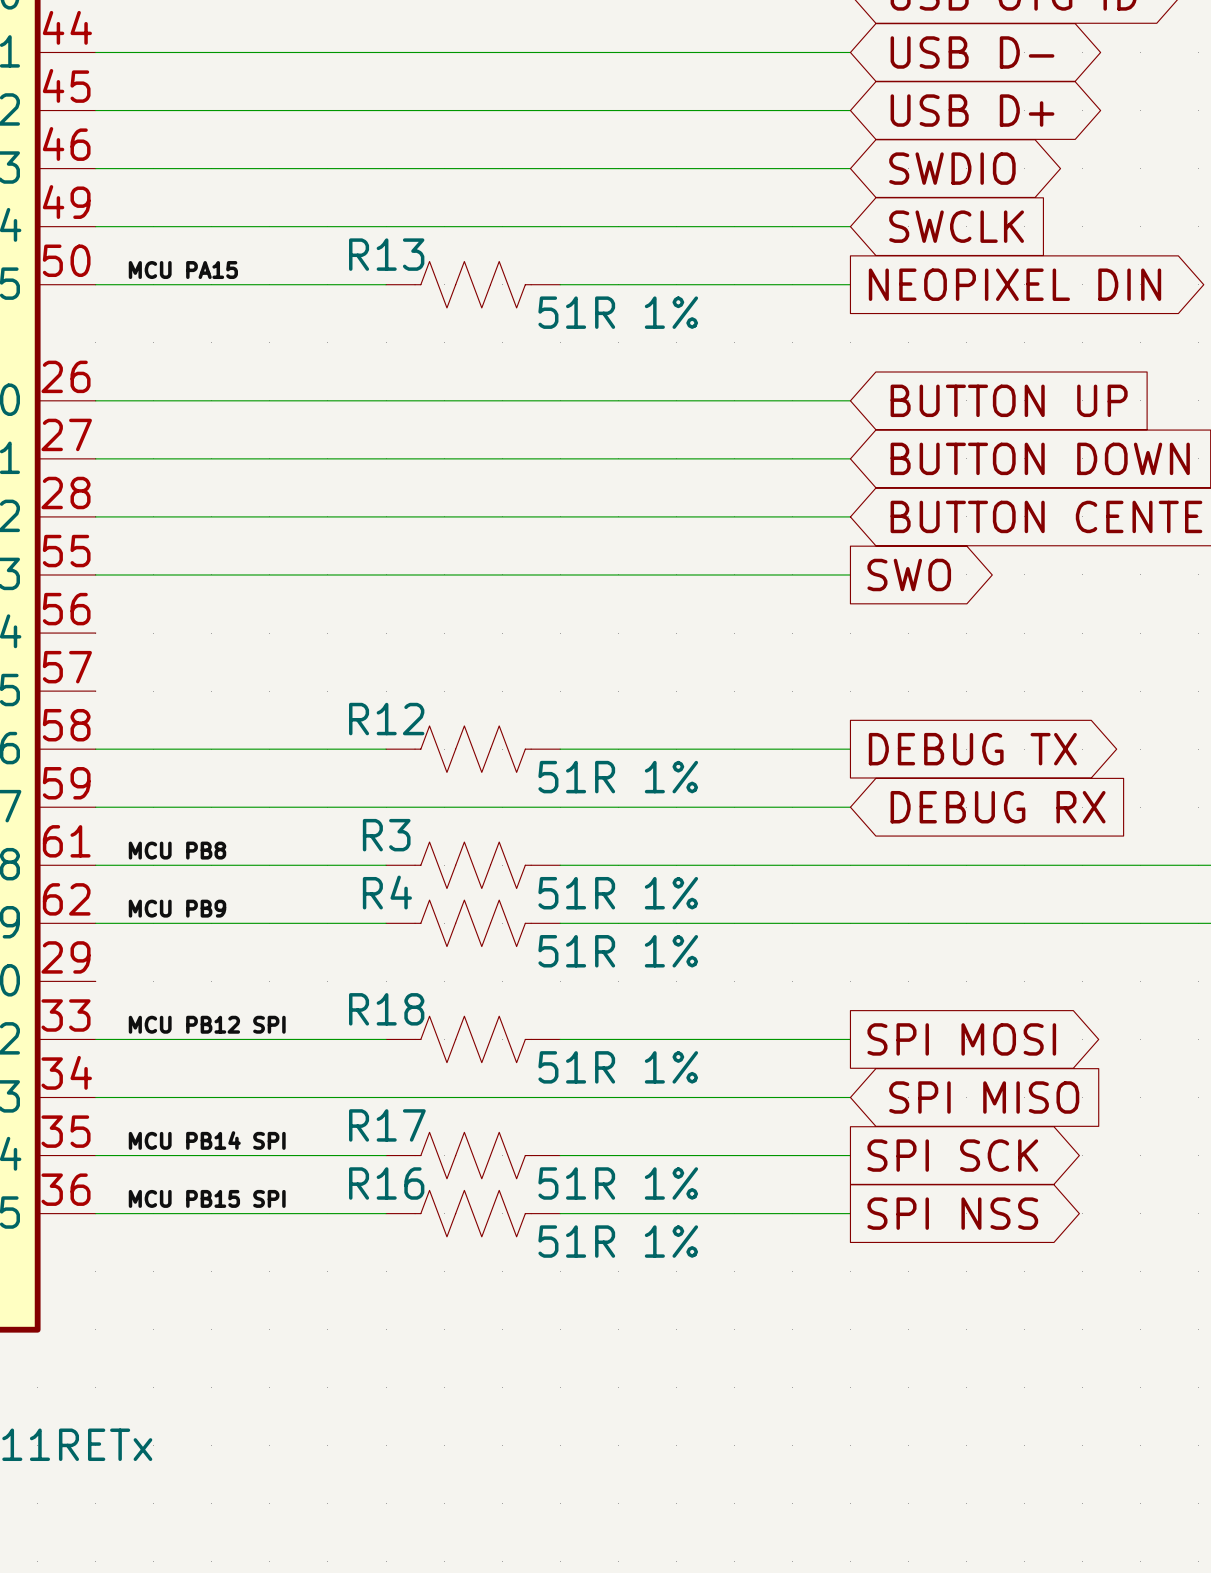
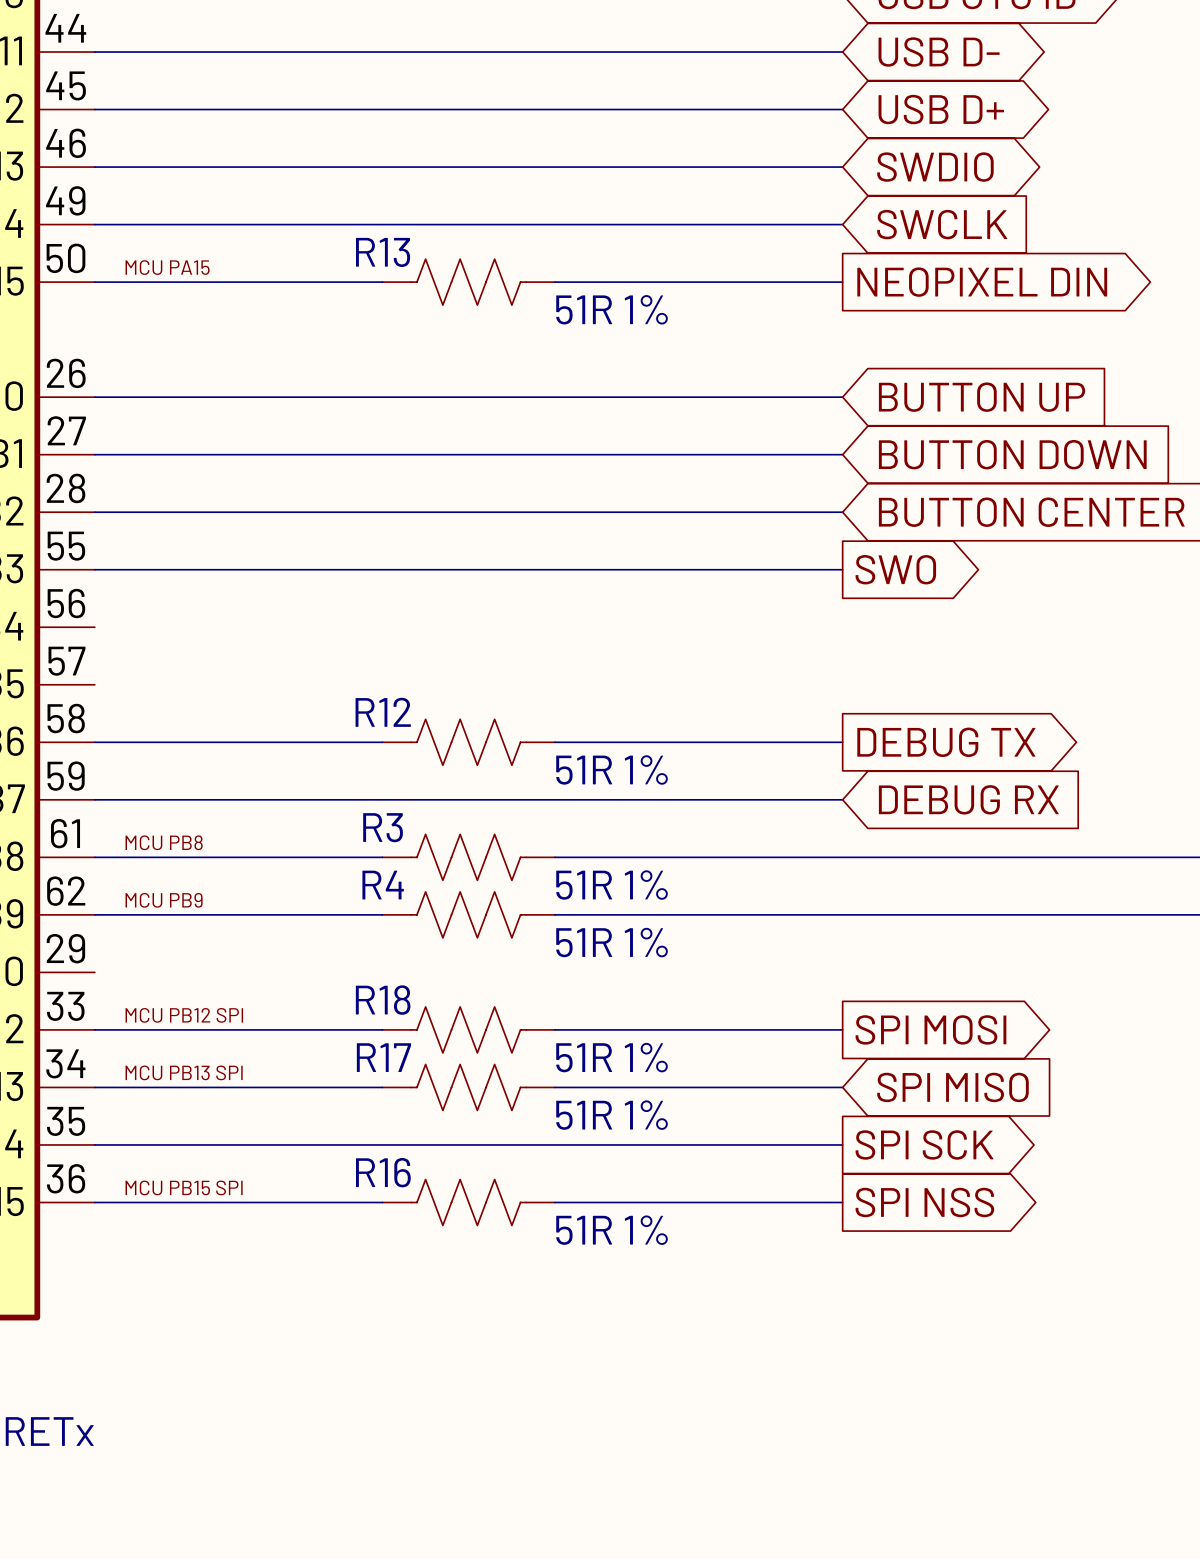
label: none -> MCU PB13 SPI (184, 1072)
wire: (386, 1097) (560, 1097) -> (382, 1144) (555, 1144)
label: MCU PB14 SPI (207, 1140) -> none
R17 position: (473, 1155) -> (468, 1087)

